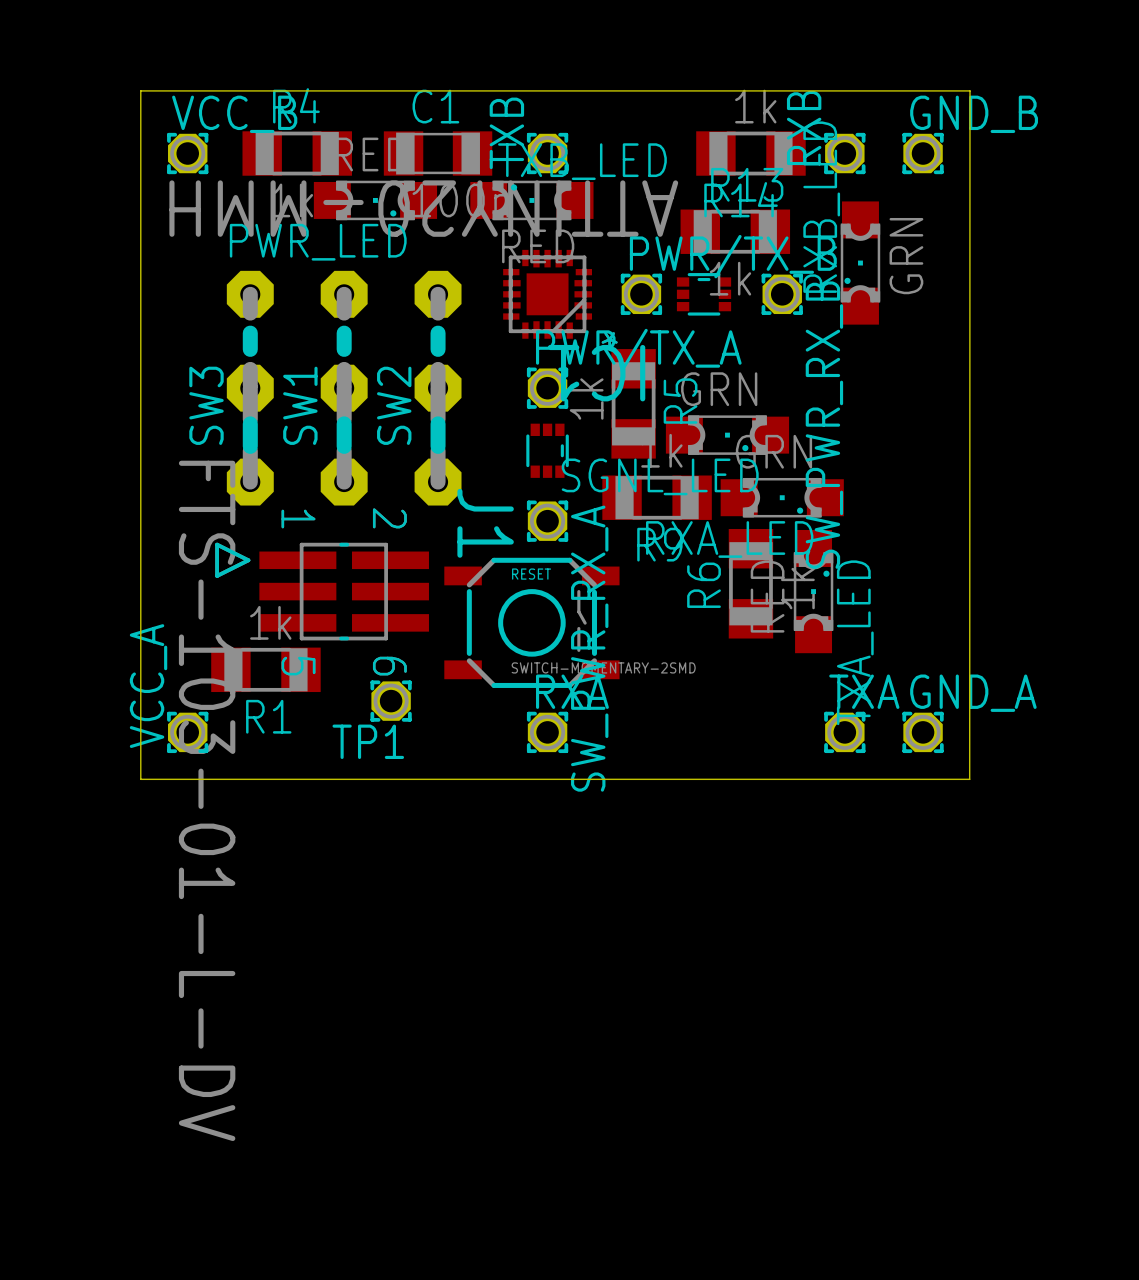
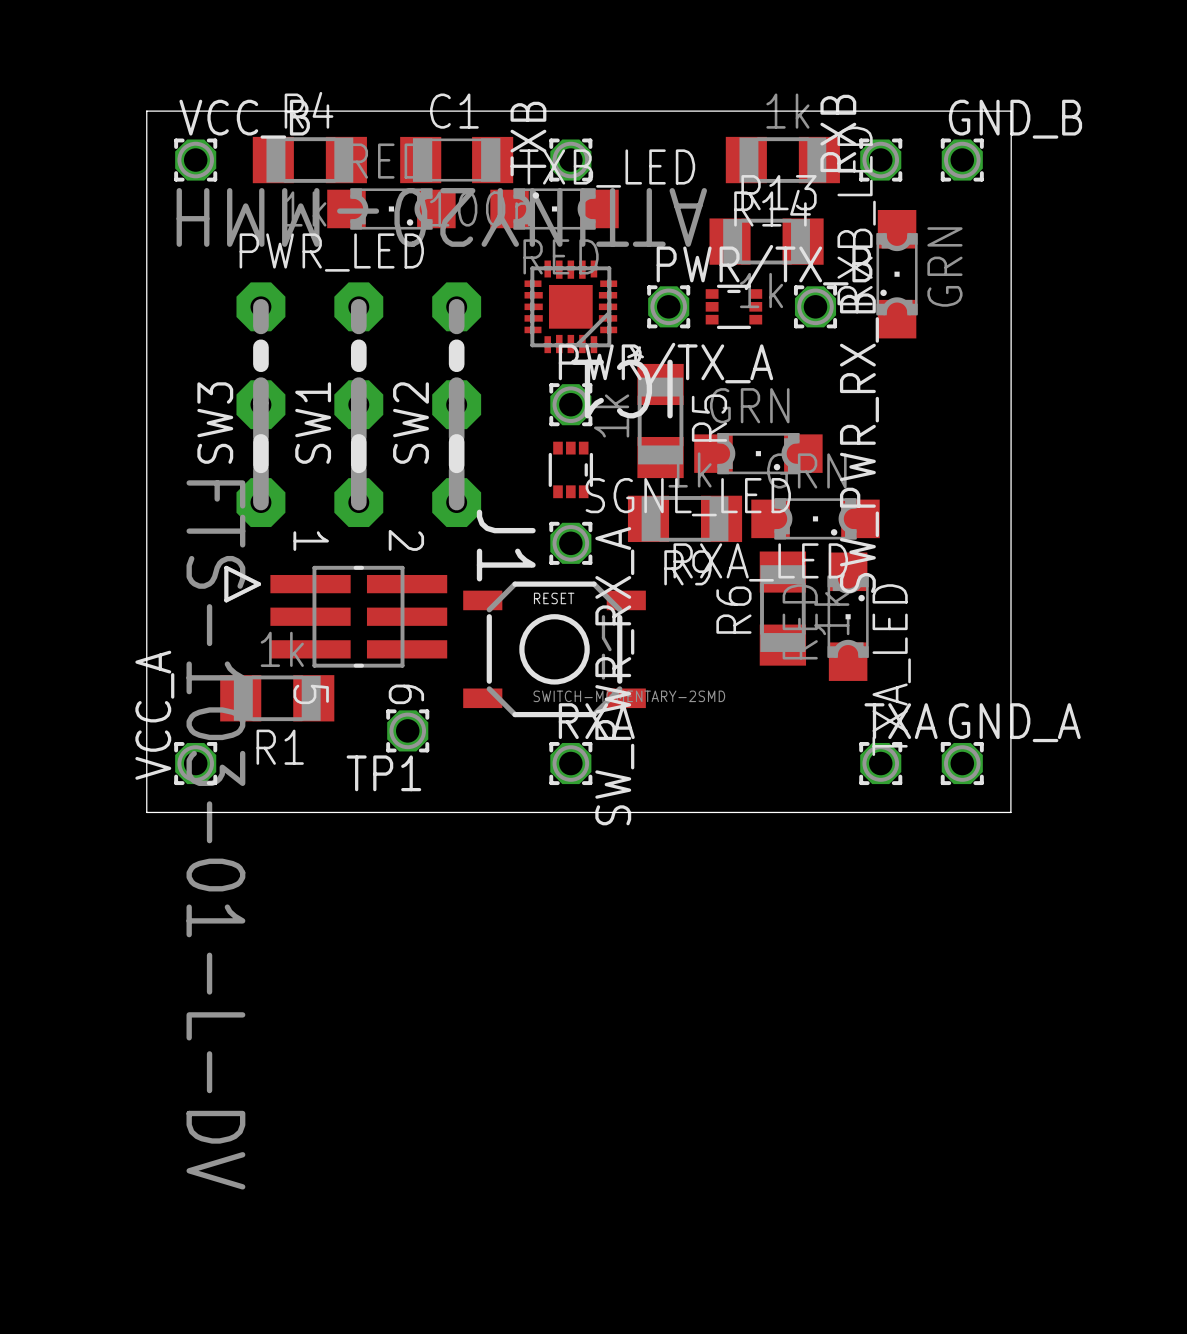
board edge: (140, 106) (140, 90) (969, 90) (969, 106) -> (146, 111) (1011, 111)

